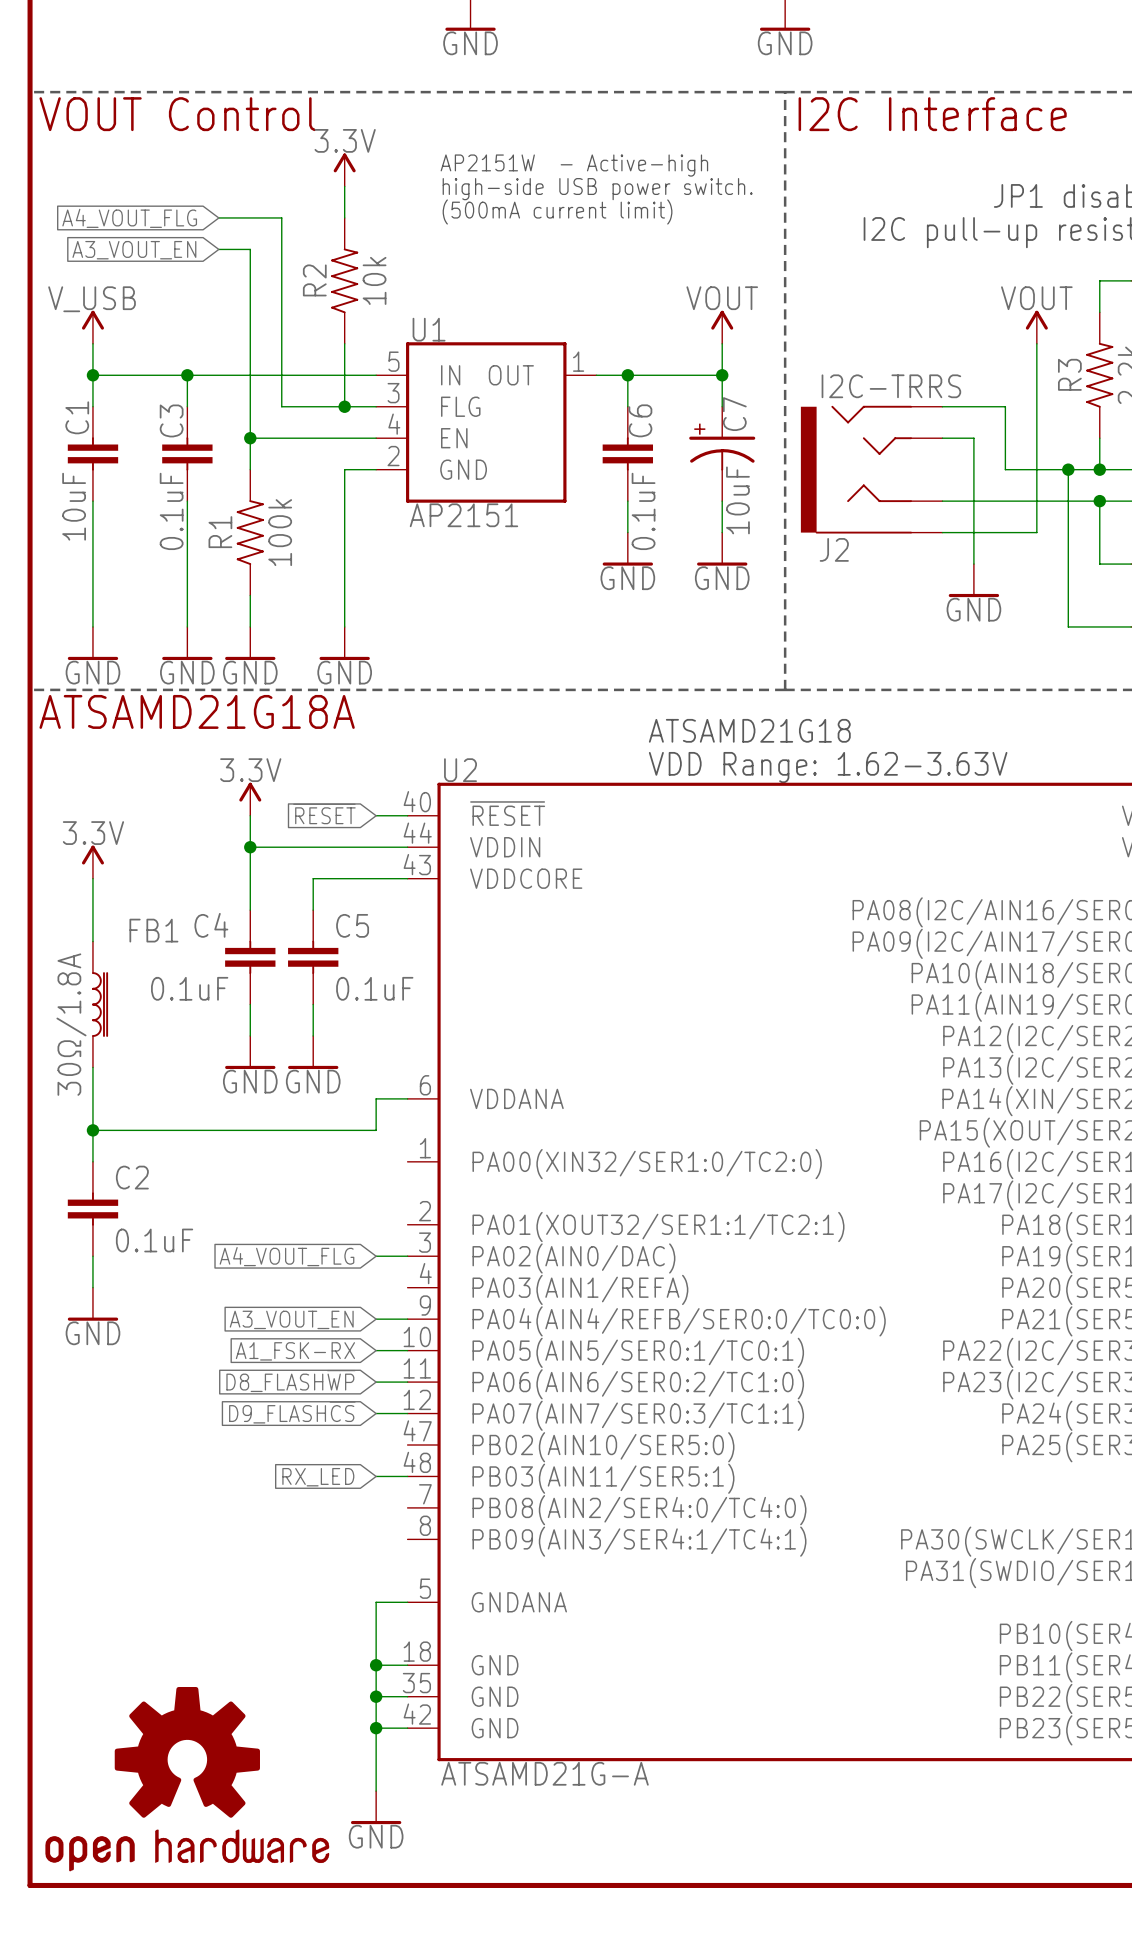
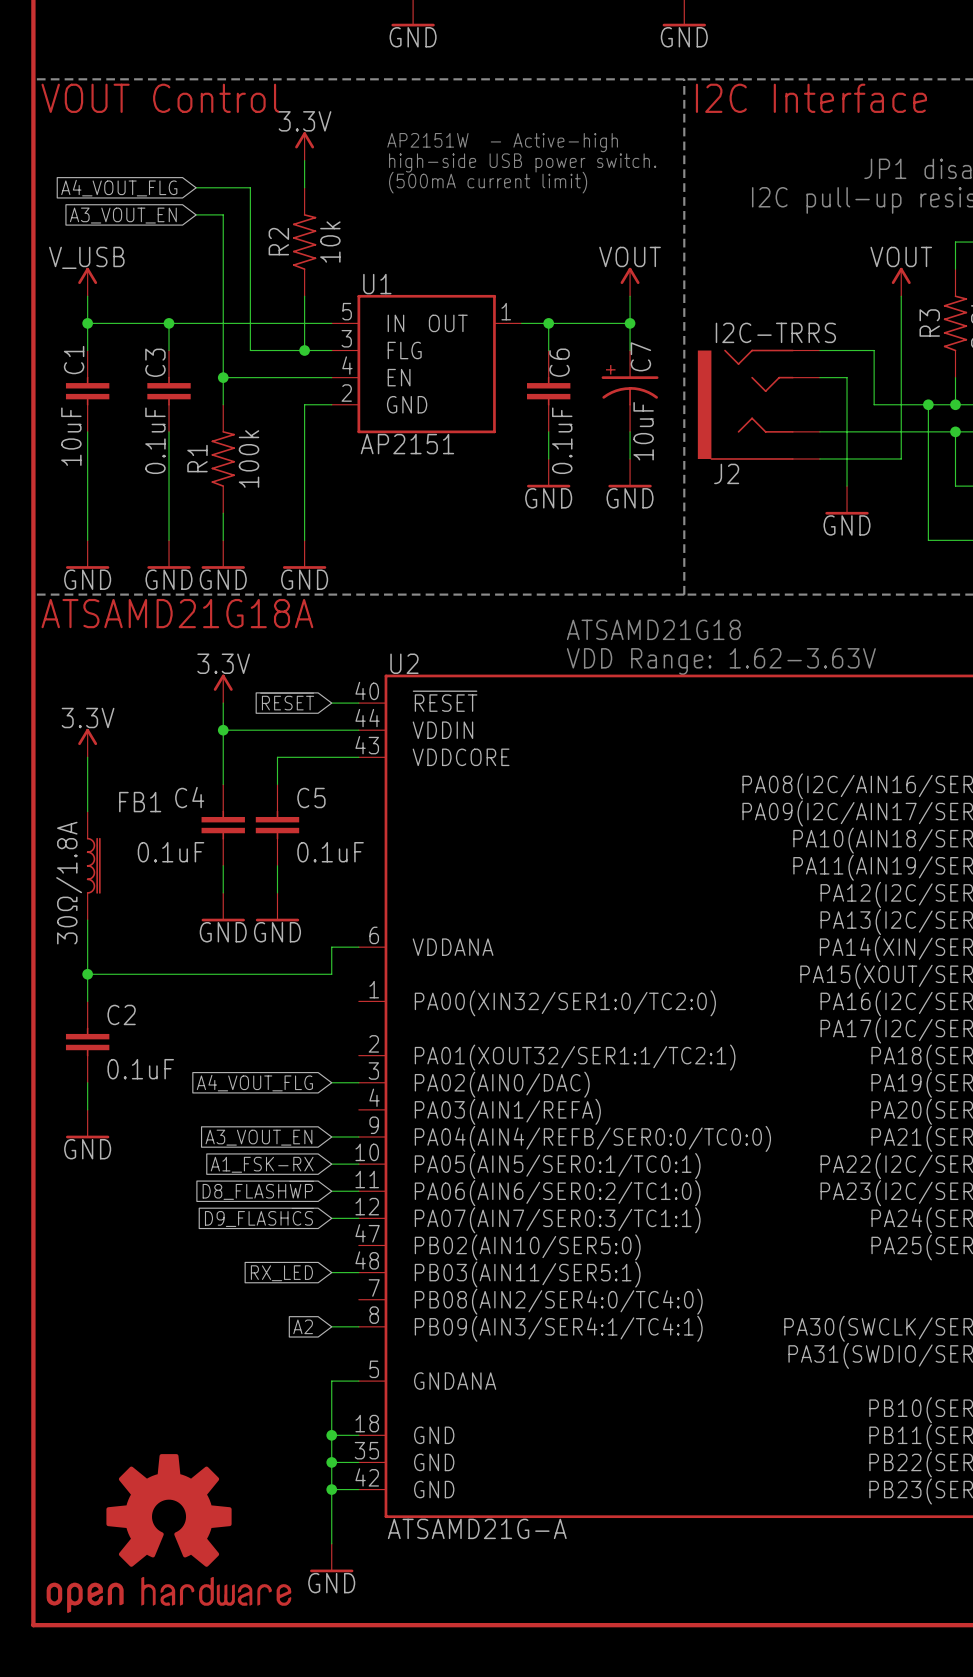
global label: none -> A2 (303, 1326)
wire: none -> (331, 1326) (358, 1326)

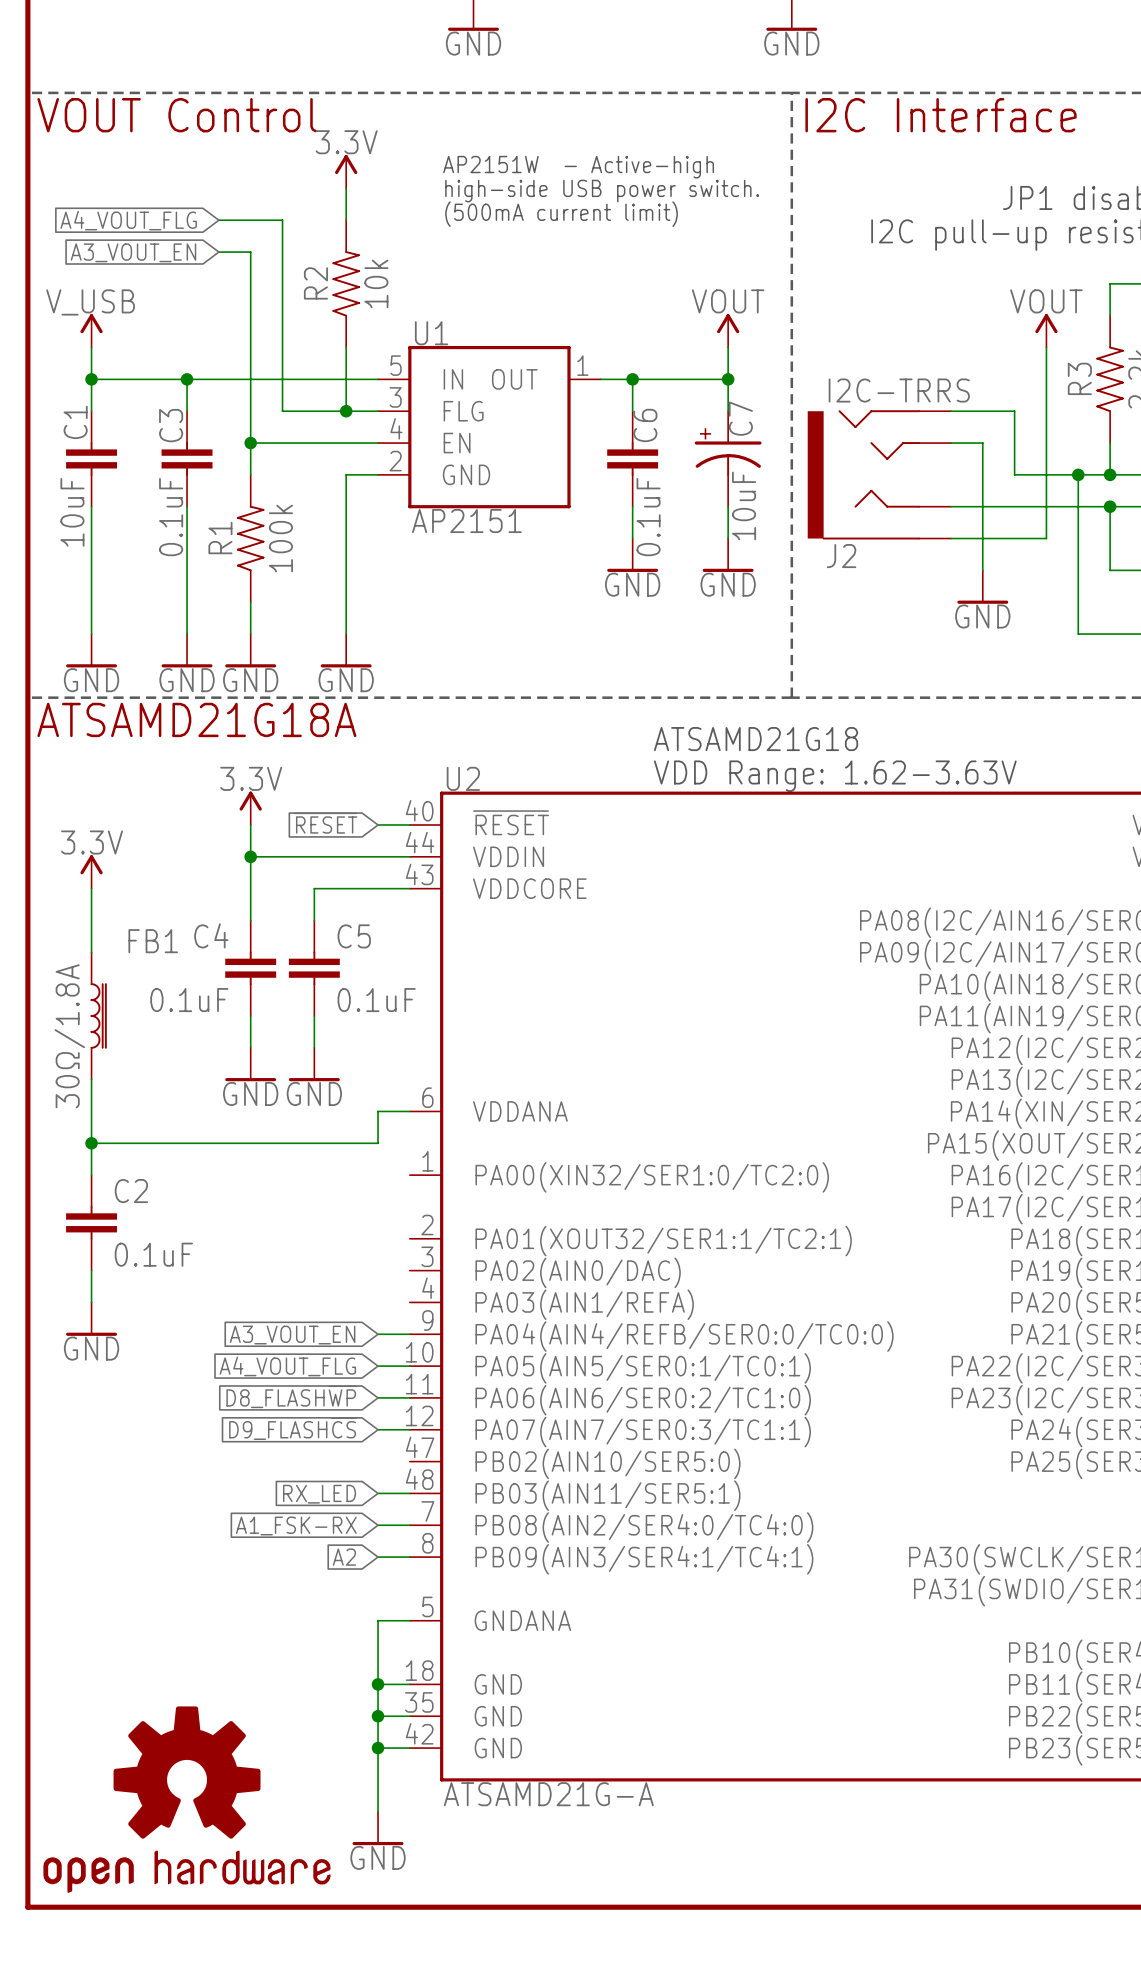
wire: (331, 1082) (358, 1082) -> (378, 1525) (409, 1525)
global label: A4_VOUT_FLG (254, 1083) -> none
global label: A1_FSK-RX (262, 1164) -> A4_VOUT_FLG (287, 1366)
global label: none -> A1_FSK-RX (296, 1526)

